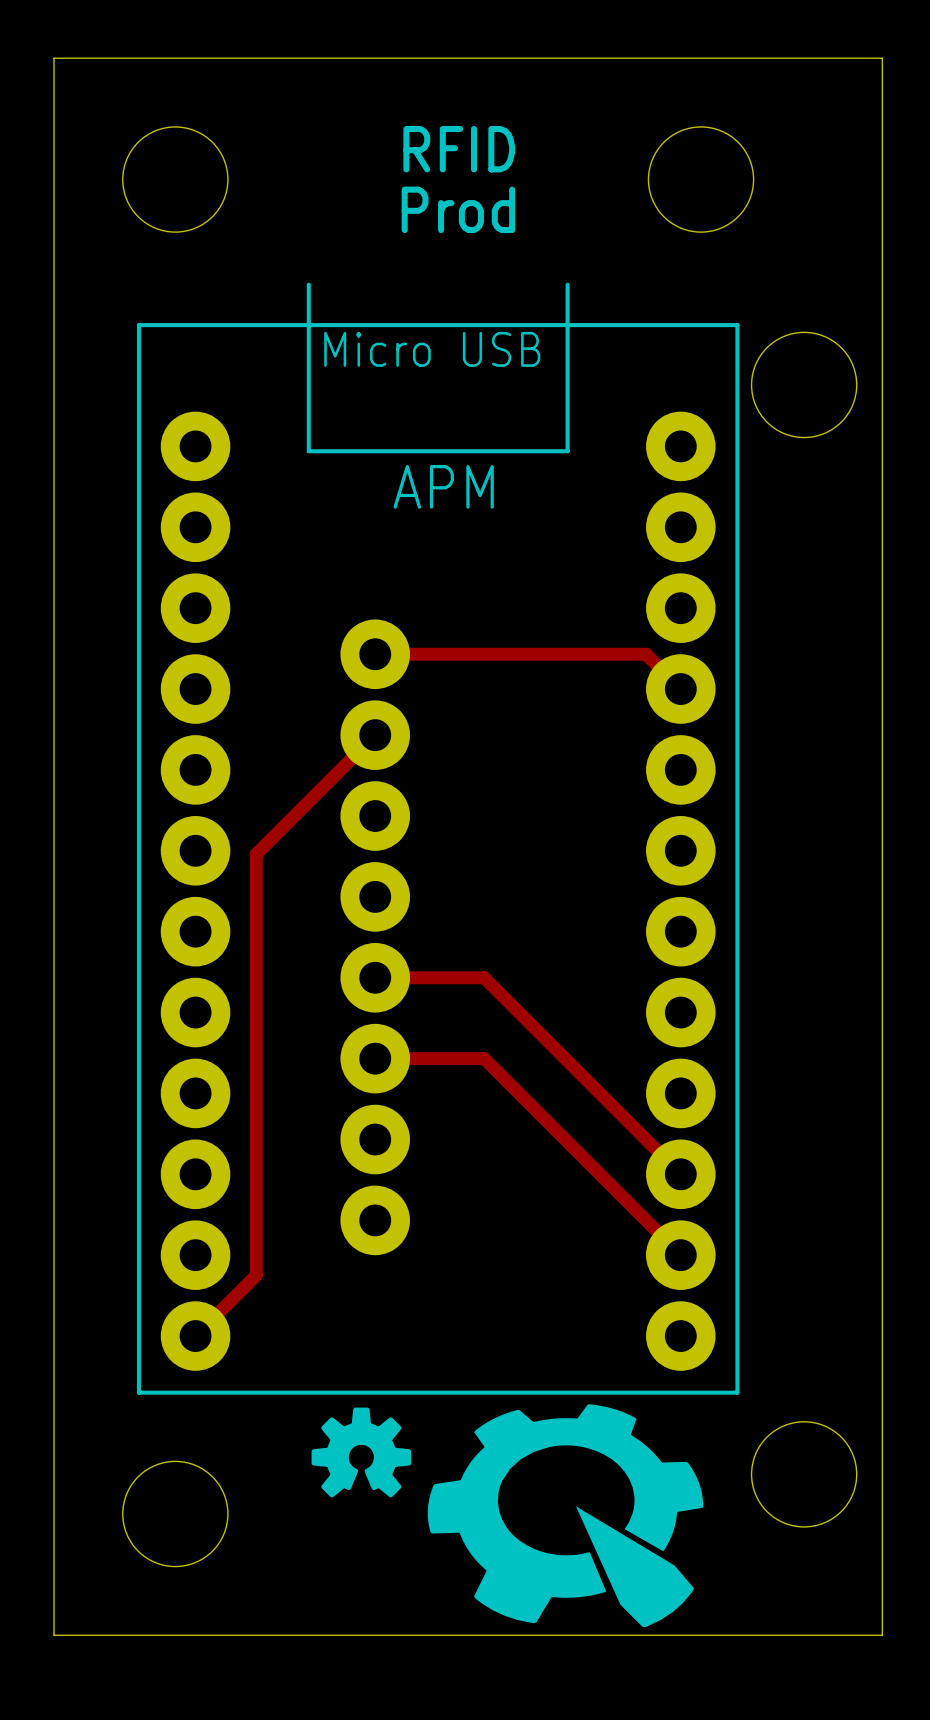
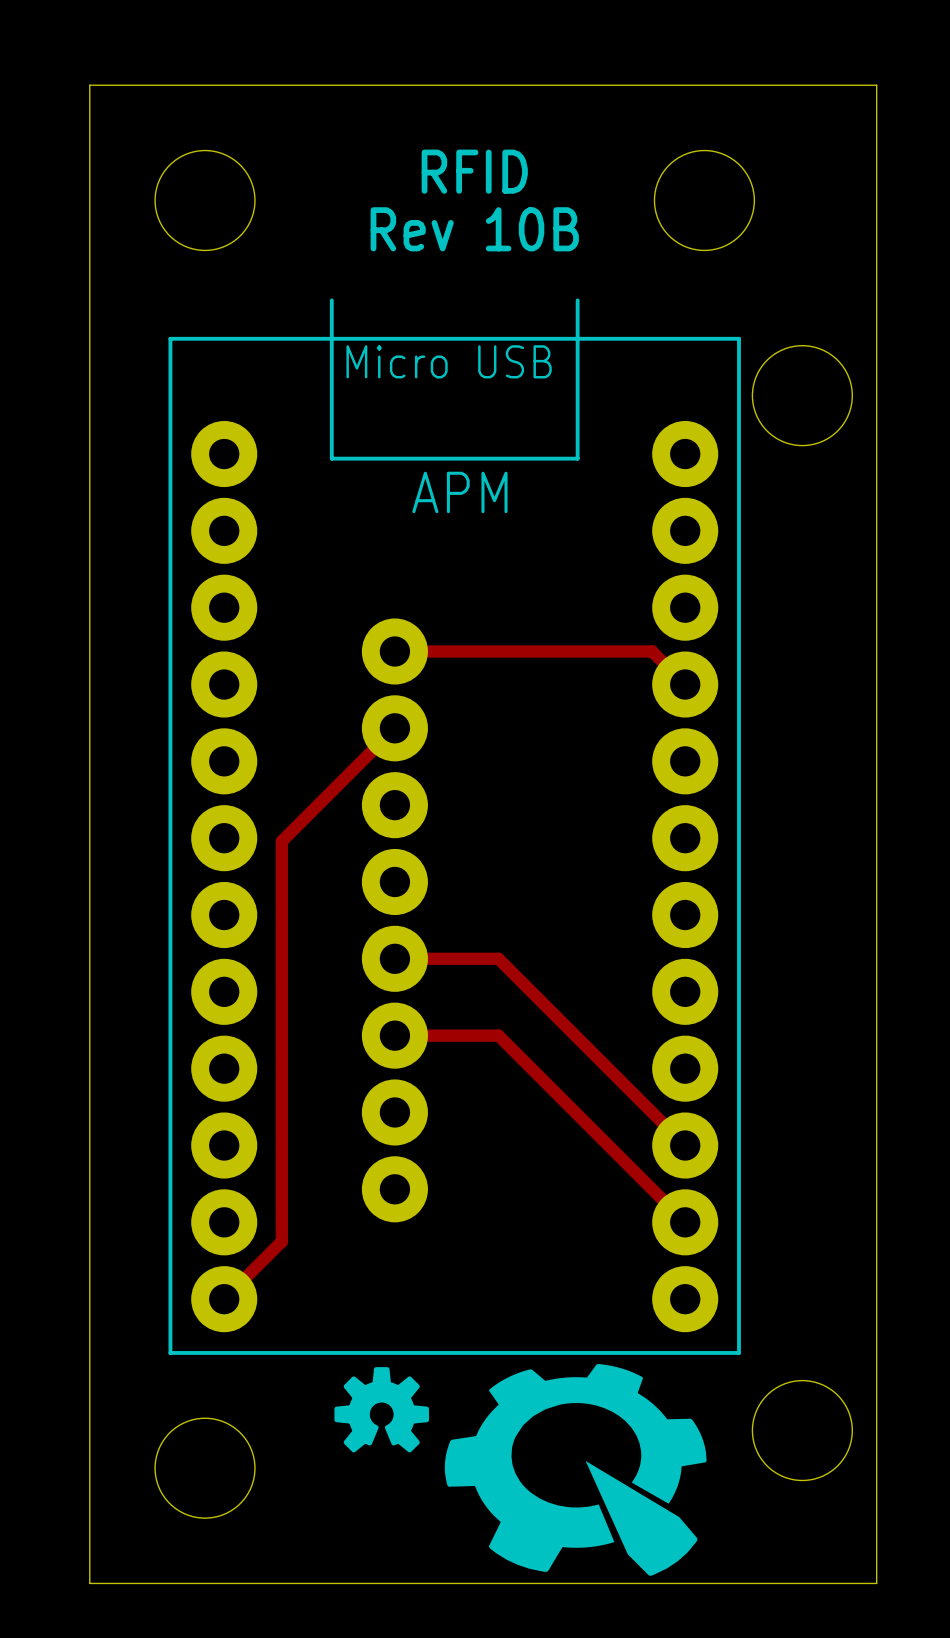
text: Prod (458, 209) -> Rev 10B (474, 229)

